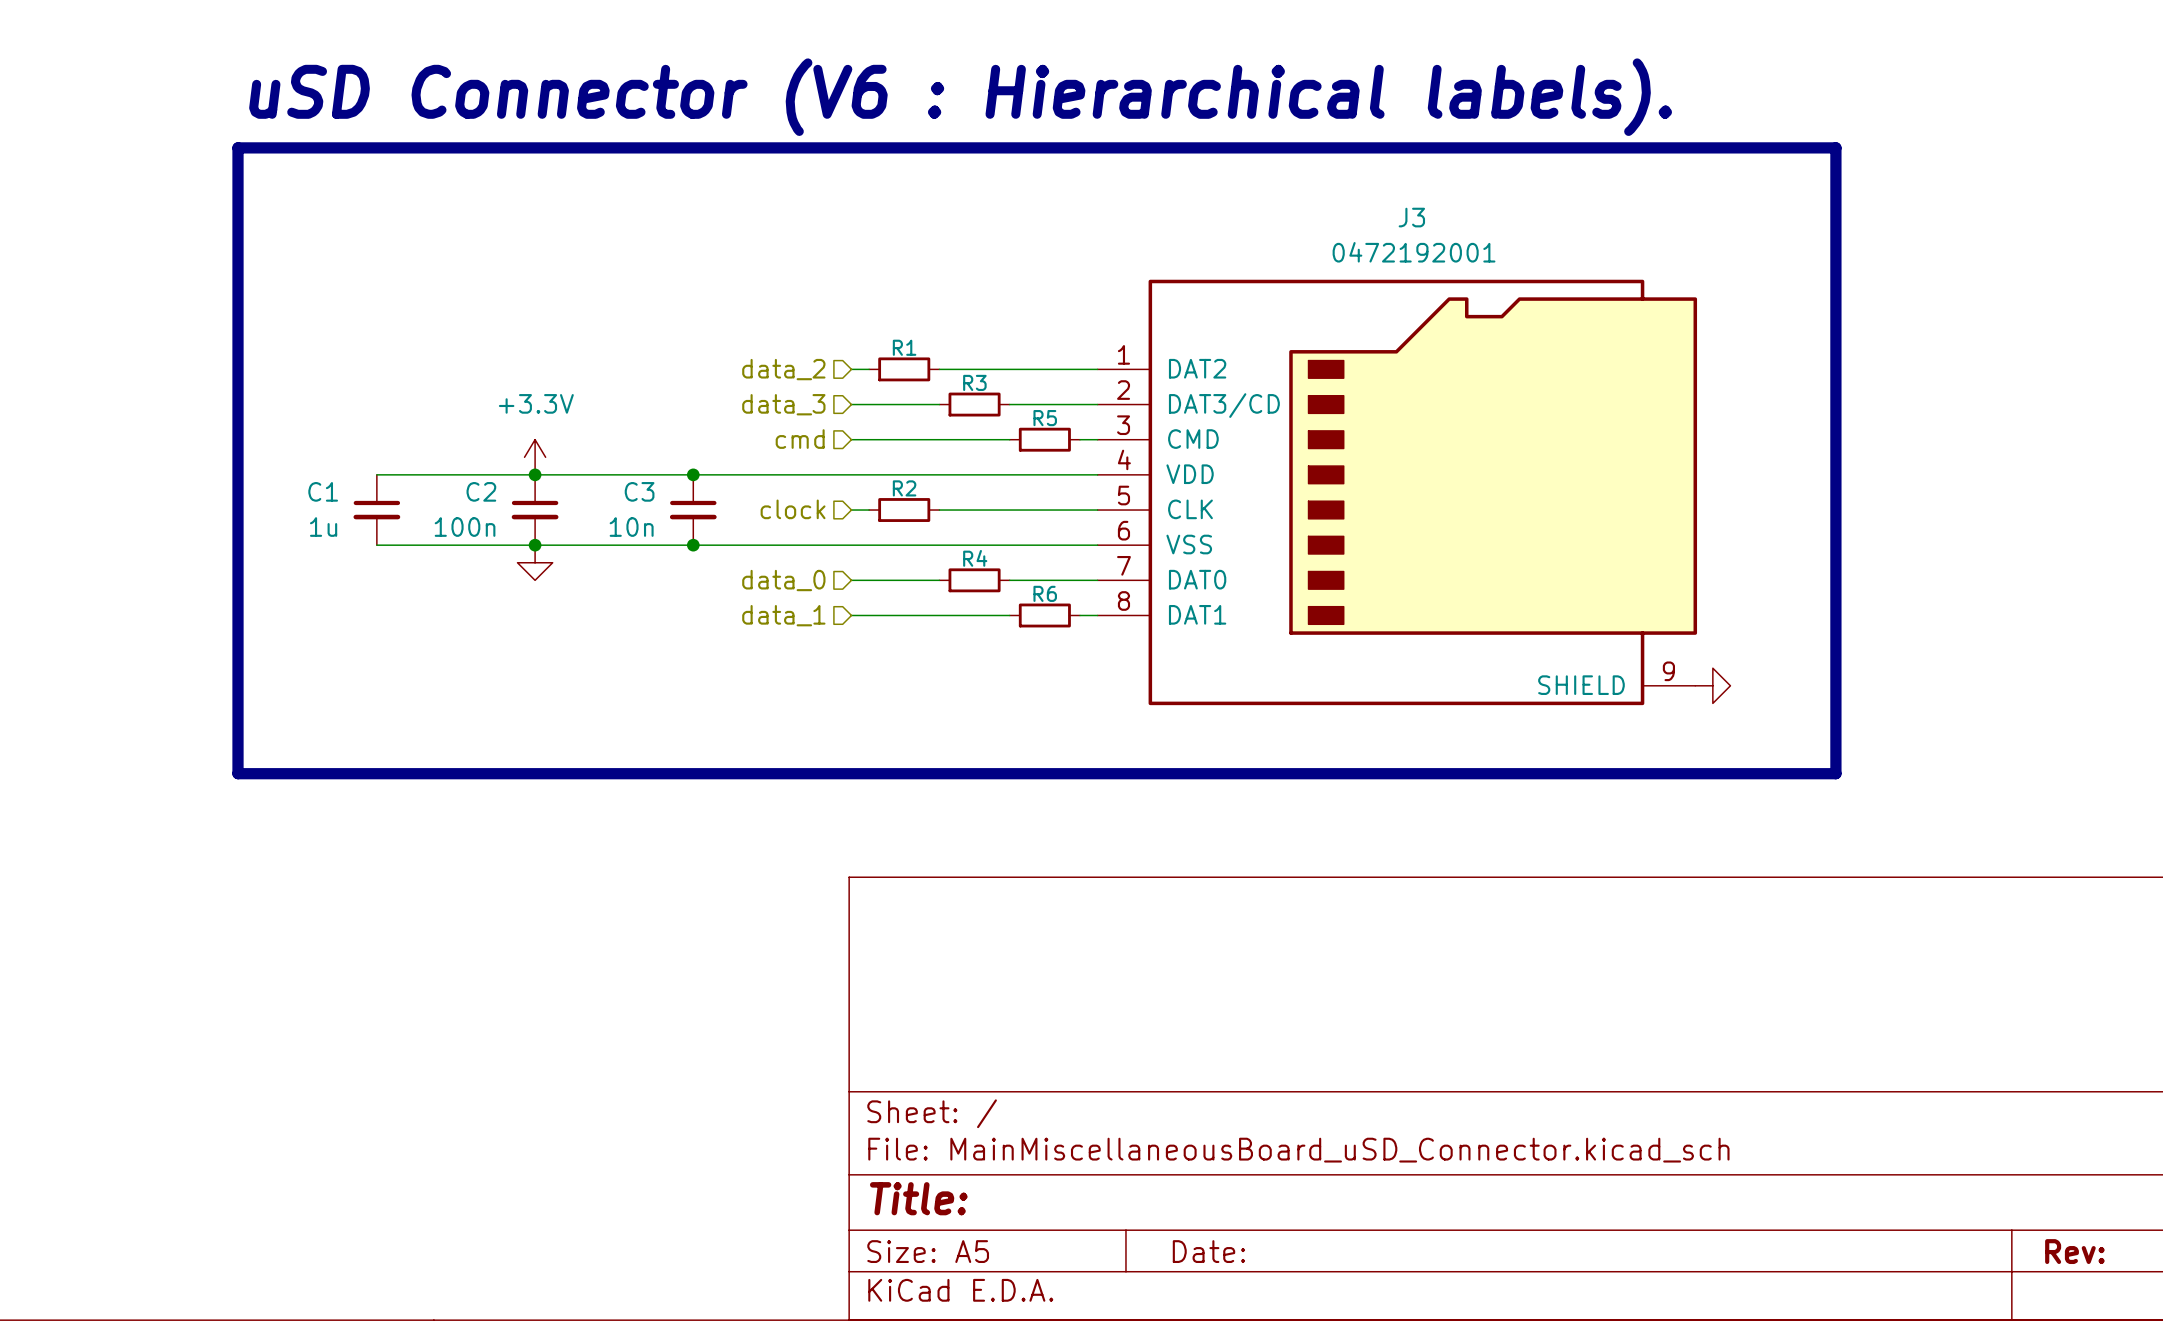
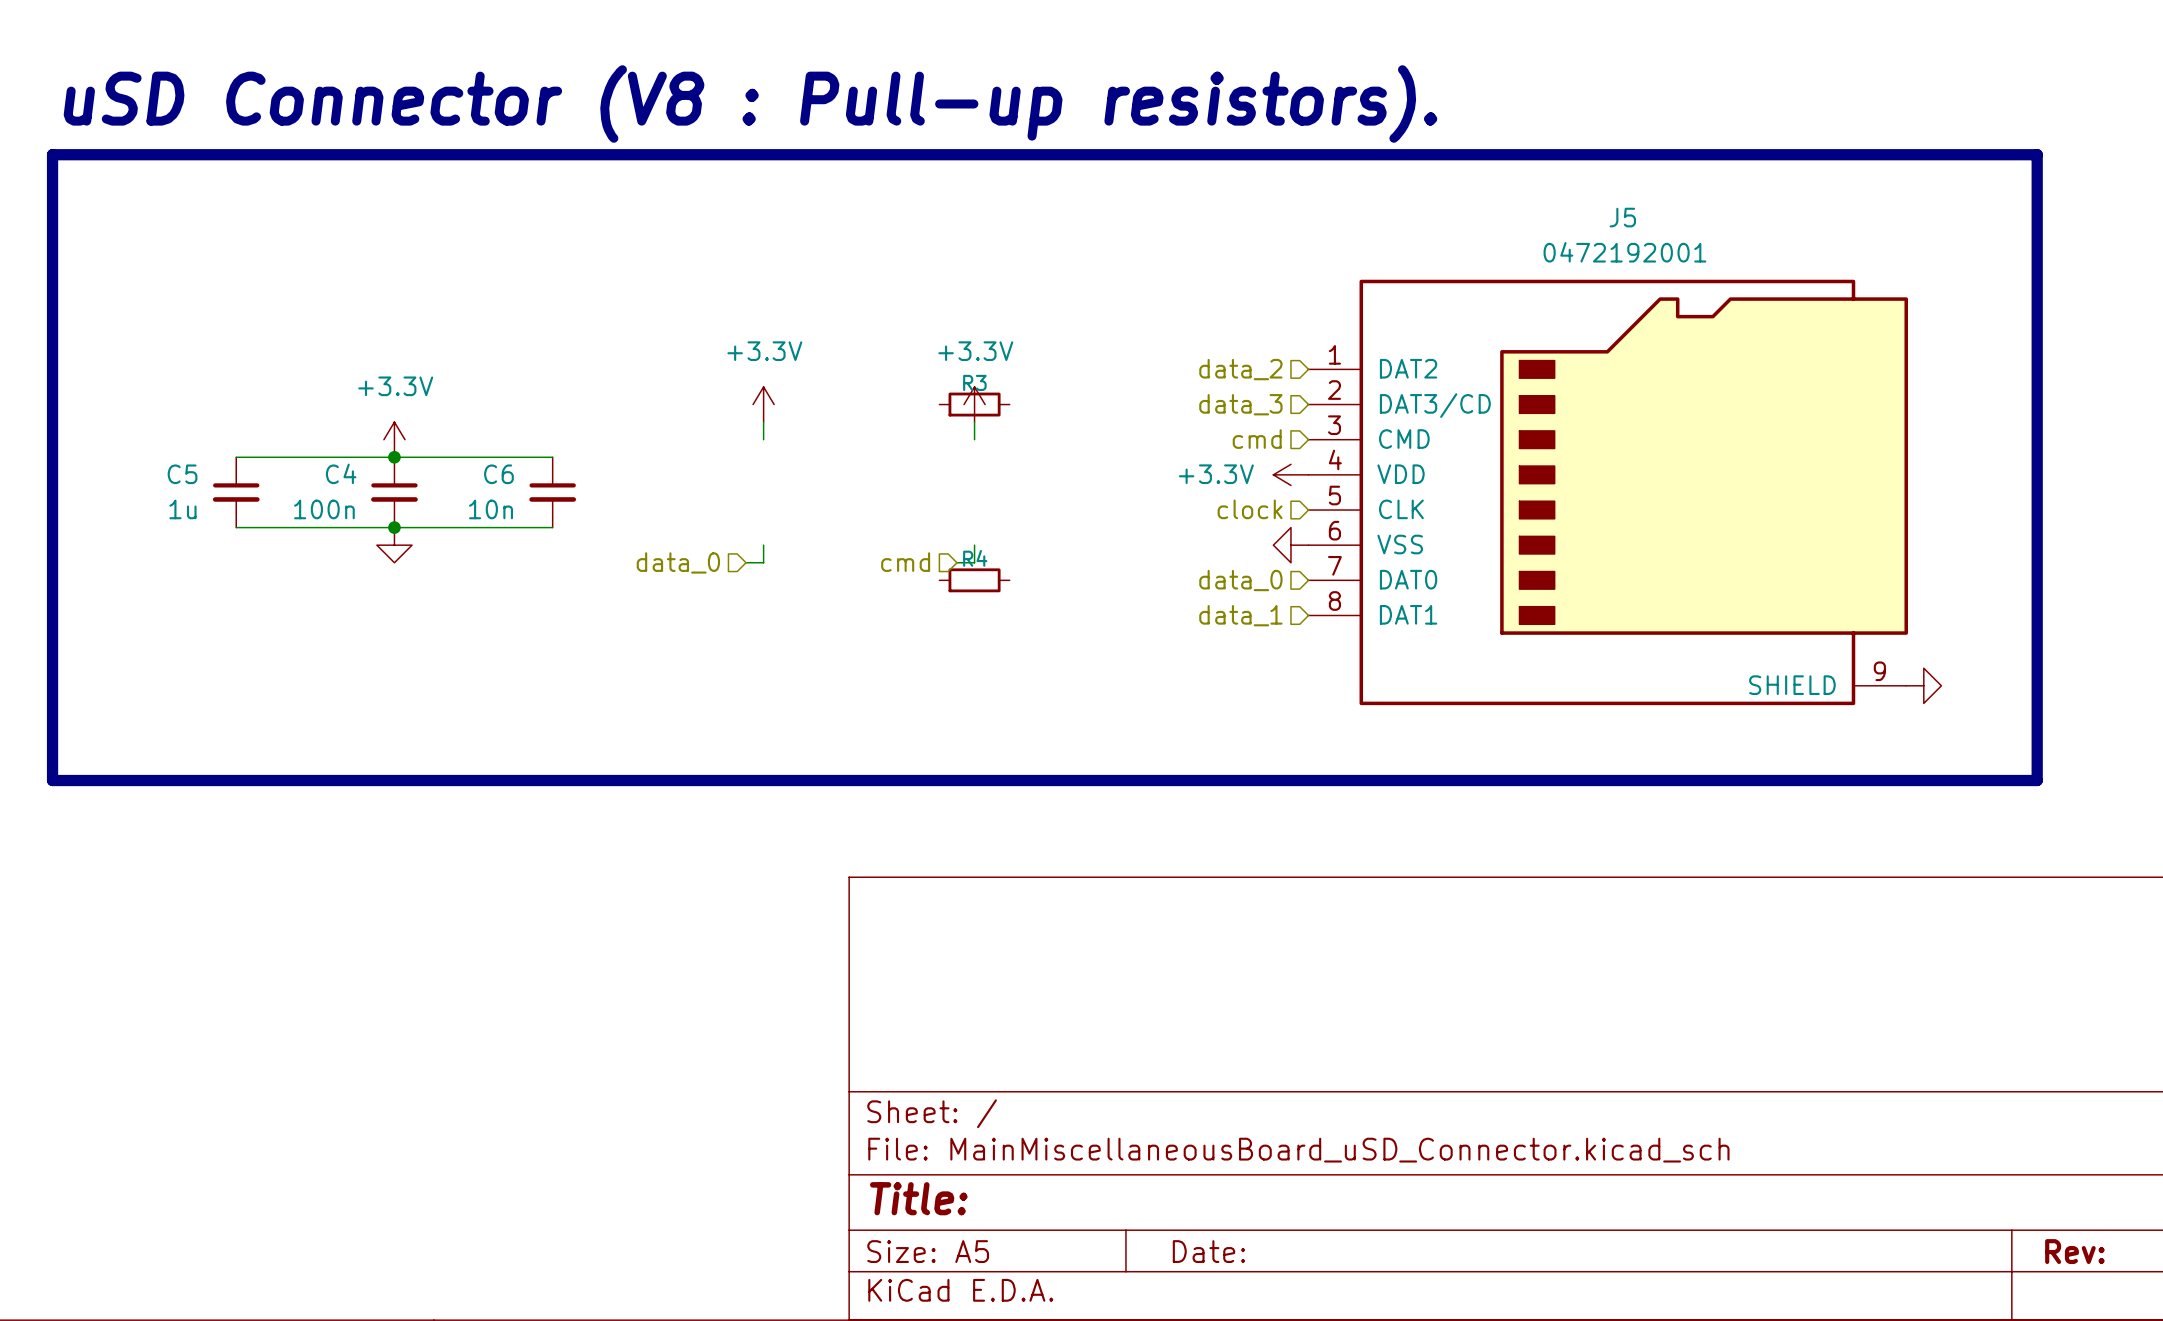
text: uSD Connector (V6 : Hierarchical labels). (960, 97) -> none
text: none -> uSD Connector (V8 : Pull-up resistors). (750, 103)
line: (238, 147) (1835, 147) (1835, 773) (238, 773) (238, 147) -> (52, 154) (52, 780) (2037, 780) (2037, 154) (52, 154)
hierarchical label: data_2 (783, 369) -> none
wire: (851, 369) (869, 369) -> none
R1: (904, 369) -> none
wire: (939, 369) (1097, 369) -> none
hierarchical label: none -> data_2 (1240, 369)
power symbol: none -> +3.3V (763, 404)
hierarchical label: data_3 (783, 404) -> none
wire: (851, 404) (939, 404) -> none
power symbol: none -> +3.3V (974, 404)
wire: (1009, 404) (1097, 404) -> none
hierarchical label: none -> data_3 (1240, 404)
wire: none -> (763, 422) (763, 439)
wire: none -> (974, 422) (974, 439)
power symbol: none -> +3.3V (394, 439)
hierarchical label position: cmd (800, 439) -> cmd (905, 562)
wire: (851, 439) (1009, 439) -> none
R5: (1044, 439) -> none
wire: (1080, 439) (1097, 439) -> none
hierarchical label: none -> cmd (1257, 439)
wire: none -> (236, 457) (552, 457)
junction: none -> (394, 457)
power symbol: +3.3V (535, 457) -> none
wire: (376, 474) (1097, 474) -> none
junction: (535, 474) -> none
junction: (693, 474) -> none
power symbol: none -> +3.3V (1290, 474)
C5: none -> 1u (236, 492)
C4: none -> 100n (394, 492)
C6: none -> 10n (552, 492)
J3: 0472192001 (1397, 492) -> none
J5: none -> 0472192001 (1608, 492)
hierarchical label: clock (793, 509) -> none
hierarchical label: none -> clock (1250, 509)
C1: 1u (376, 510) -> none
C2: 100n (535, 510) -> none
C3: 10n (693, 510) -> none
wire: (851, 510) (869, 510) -> none
R2: (904, 510) -> none
wire: (939, 510) (1097, 510) -> none
wire: none -> (236, 527) (552, 527)
junction: none -> (394, 527)
wire: (376, 545) (1097, 545) -> none
junction: (535, 545) -> none
junction: (693, 545) -> none
wire: none -> (763, 545) (763, 562) (746, 562)
wire: none -> (974, 545) (974, 562) (956, 562)
power symbol: none -> (1290, 545)
power symbol position: (535, 562) -> (394, 545)
hierarchical label position: data_0 (783, 580) -> data_0 (678, 562)
wire: (851, 580) (939, 580) -> none
wire: (1009, 580) (1097, 580) -> none
hierarchical label: none -> data_0 (1240, 580)
hierarchical label: data_1 (783, 615) -> none
wire: (851, 615) (1009, 615) -> none
R6: (1044, 615) -> none
wire: (1080, 615) (1097, 615) -> none
hierarchical label: none -> data_1 (1240, 615)
power symbol position: (1712, 685) -> (1923, 685)

